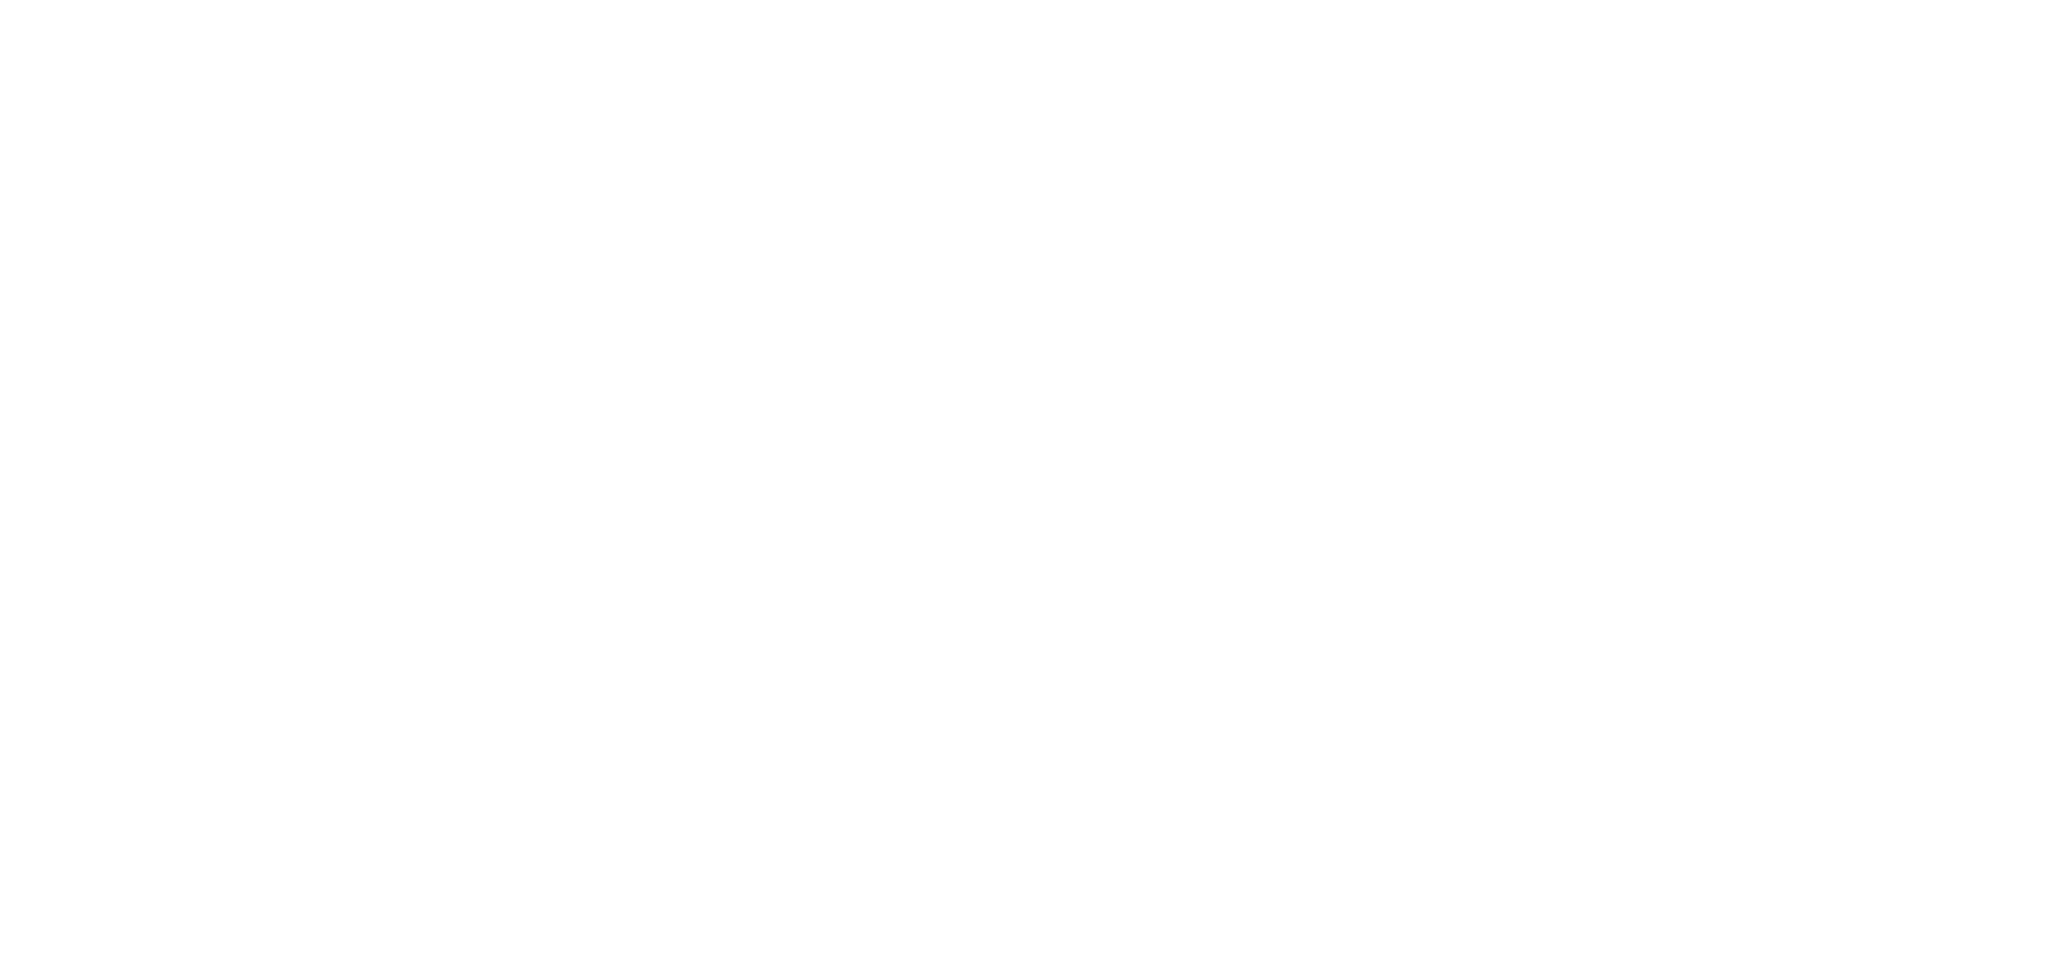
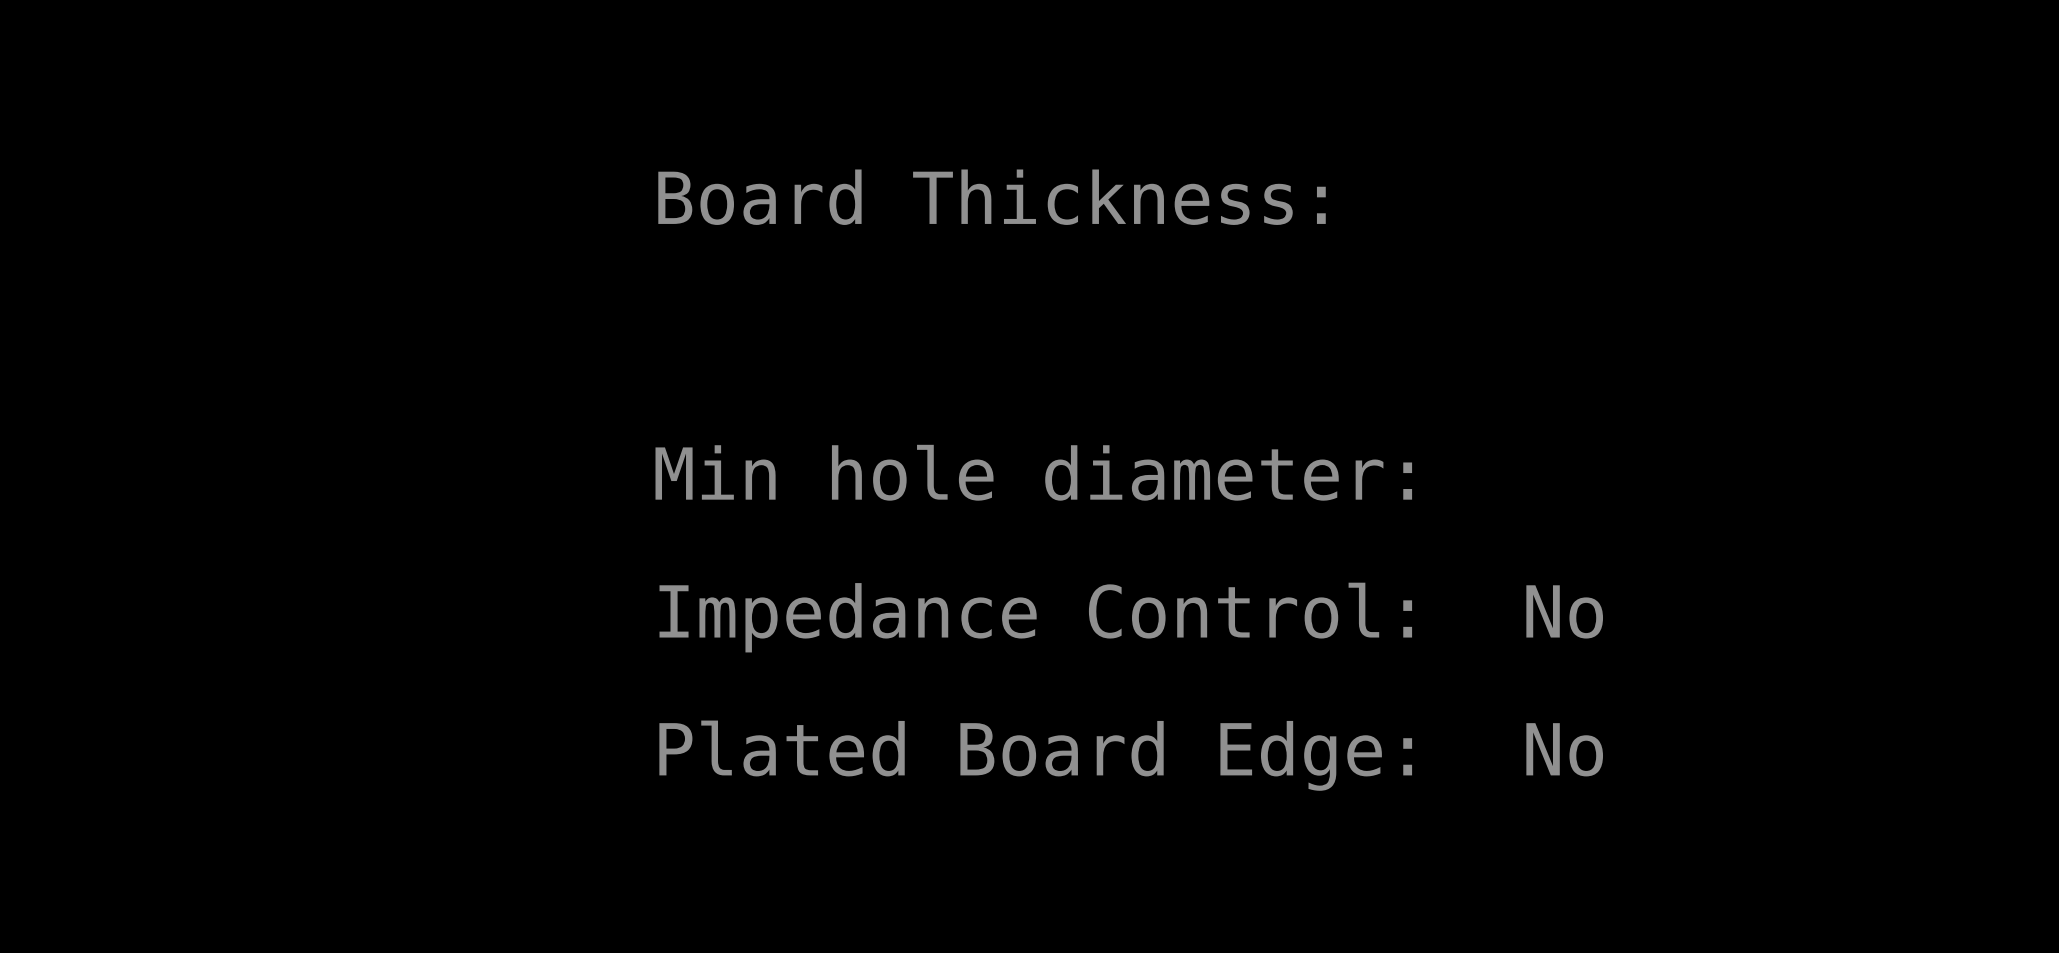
text: none -> Board Thickness: (992, 197)
text: none -> Min hole diameter: (1033, 472)
text: none -> No (1564, 611)
text: none -> Impedance Control: (1035, 617)
text: none -> No (1564, 749)
text: none -> Plated Board Edge: (1035, 755)

